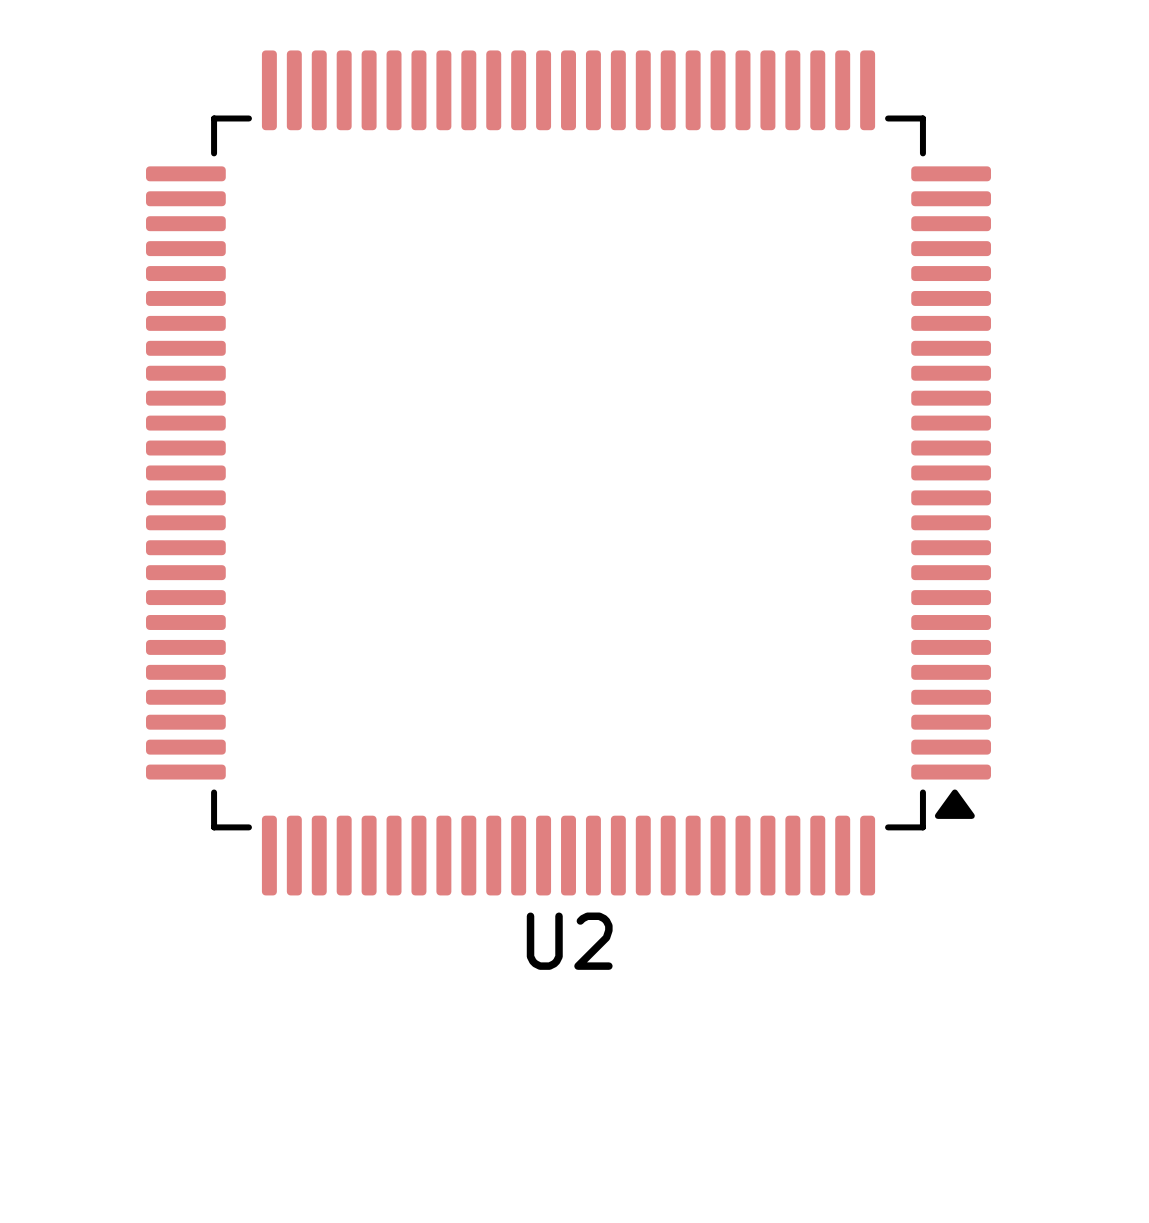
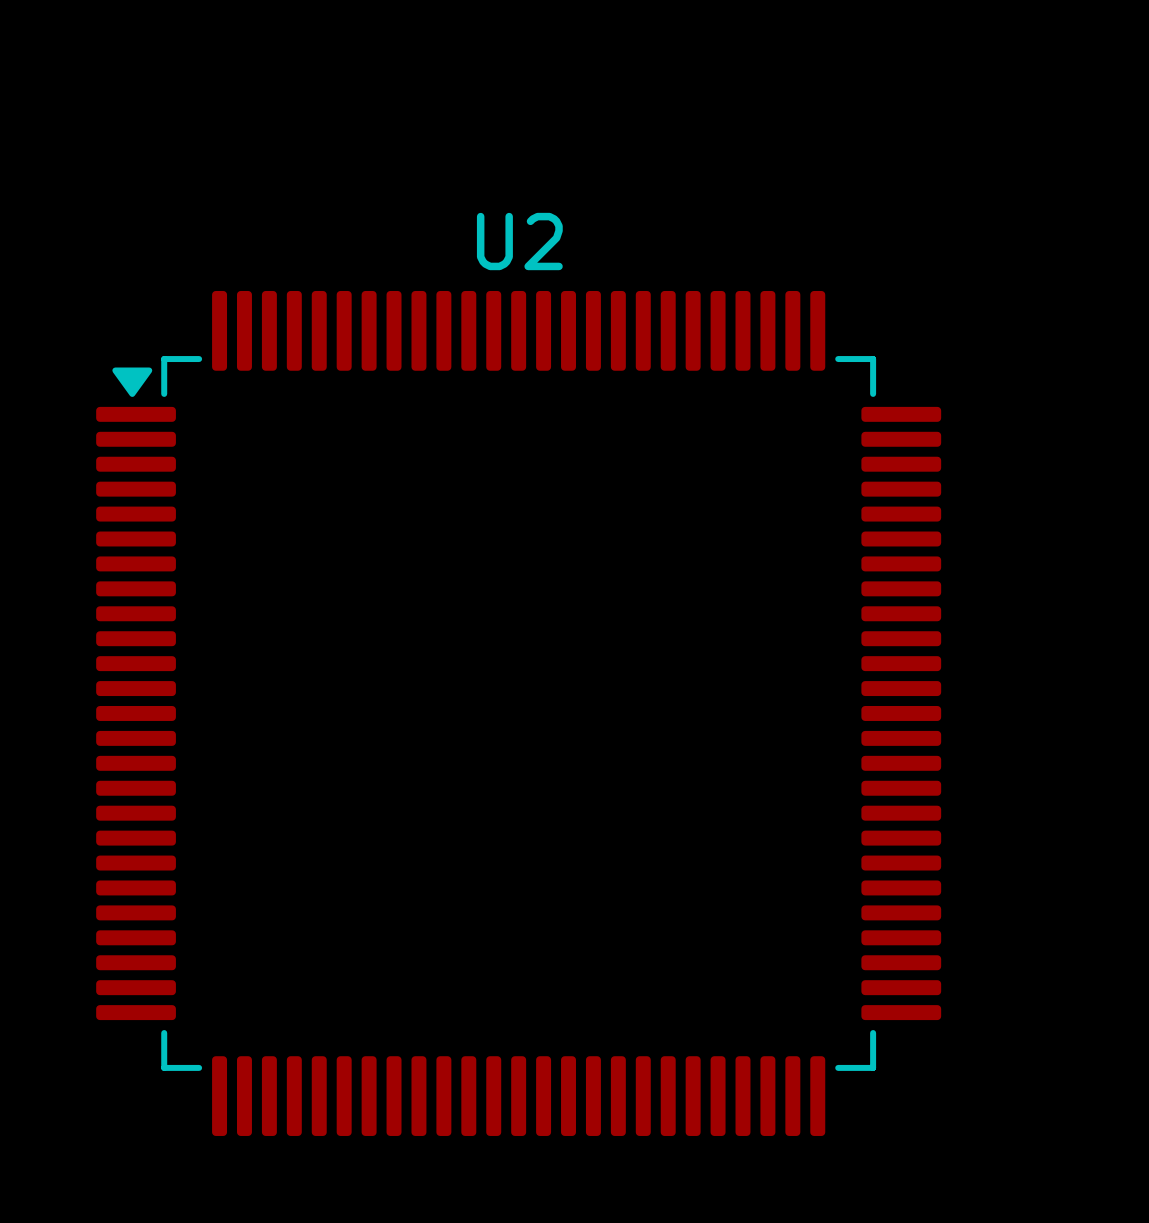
U2 rotation: 0° (568, 472) -> 180° (518, 713)

